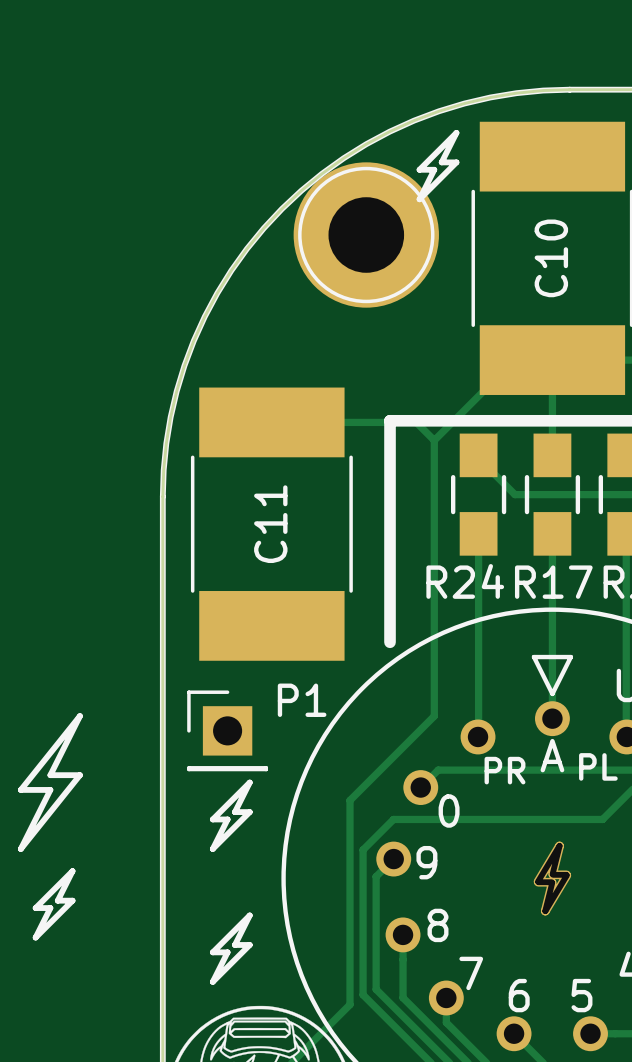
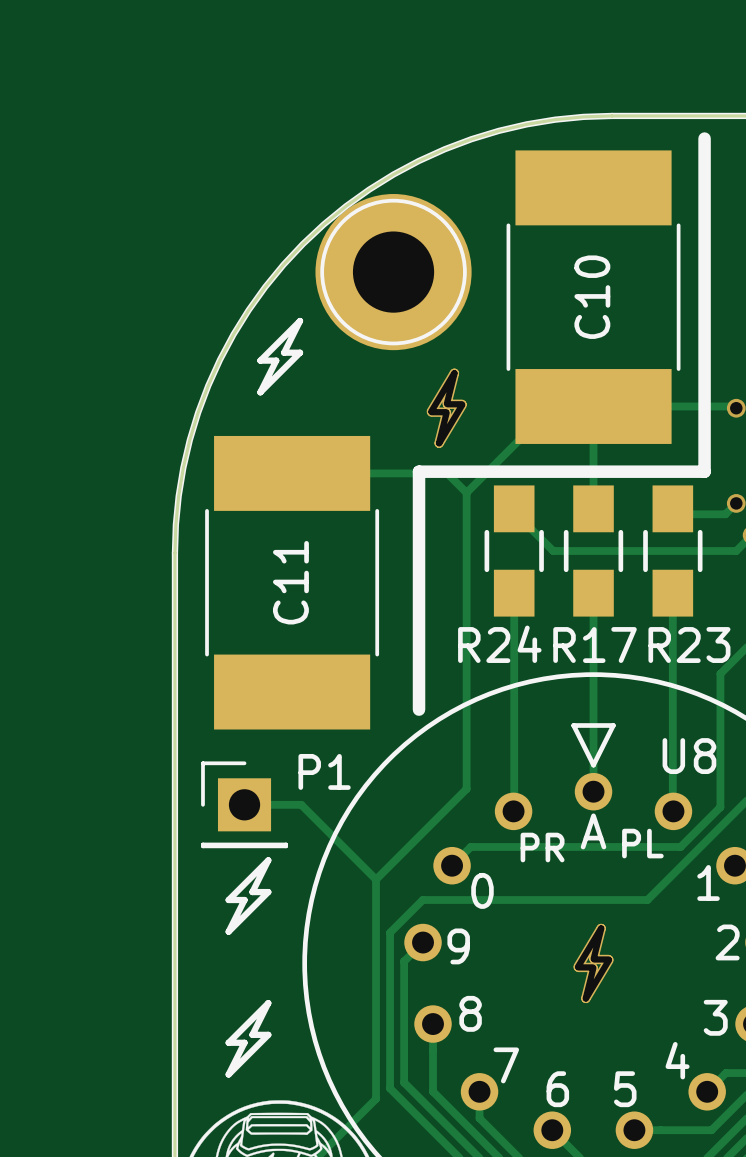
line: (456, 132) (441, 162) (456, 162) (419, 199) (434, 169) (419, 169) (456, 132) -> (300, 320) (284, 352) (300, 352) (260, 392) (276, 360) (260, 360) (300, 320)
part: none -> (446, 408)
line: (79, 716) (50, 775) (79, 775) (20, 849) (50, 789) (20, 789) (79, 716) -> none
track: none -> (244, 804) (301, 804) (376, 879)
line: (72, 871) (57, 900) (72, 900) (35, 937) (50, 908) (35, 908) (72, 871) -> none

